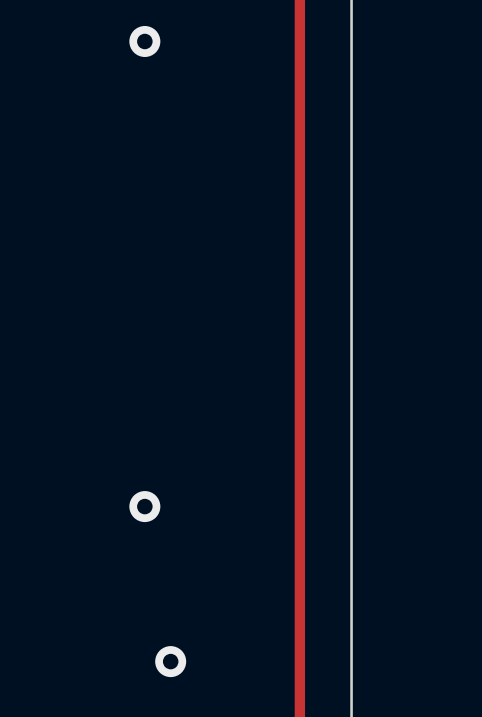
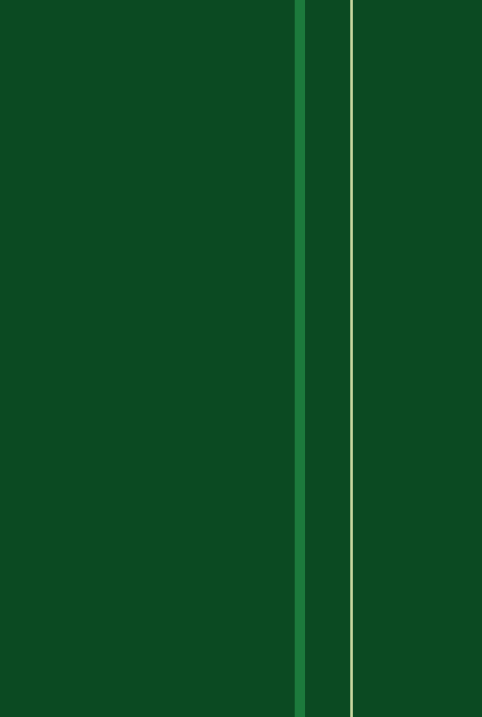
via: (144, 41) -> none
via: (144, 506) -> none
via: (170, 661) -> none

